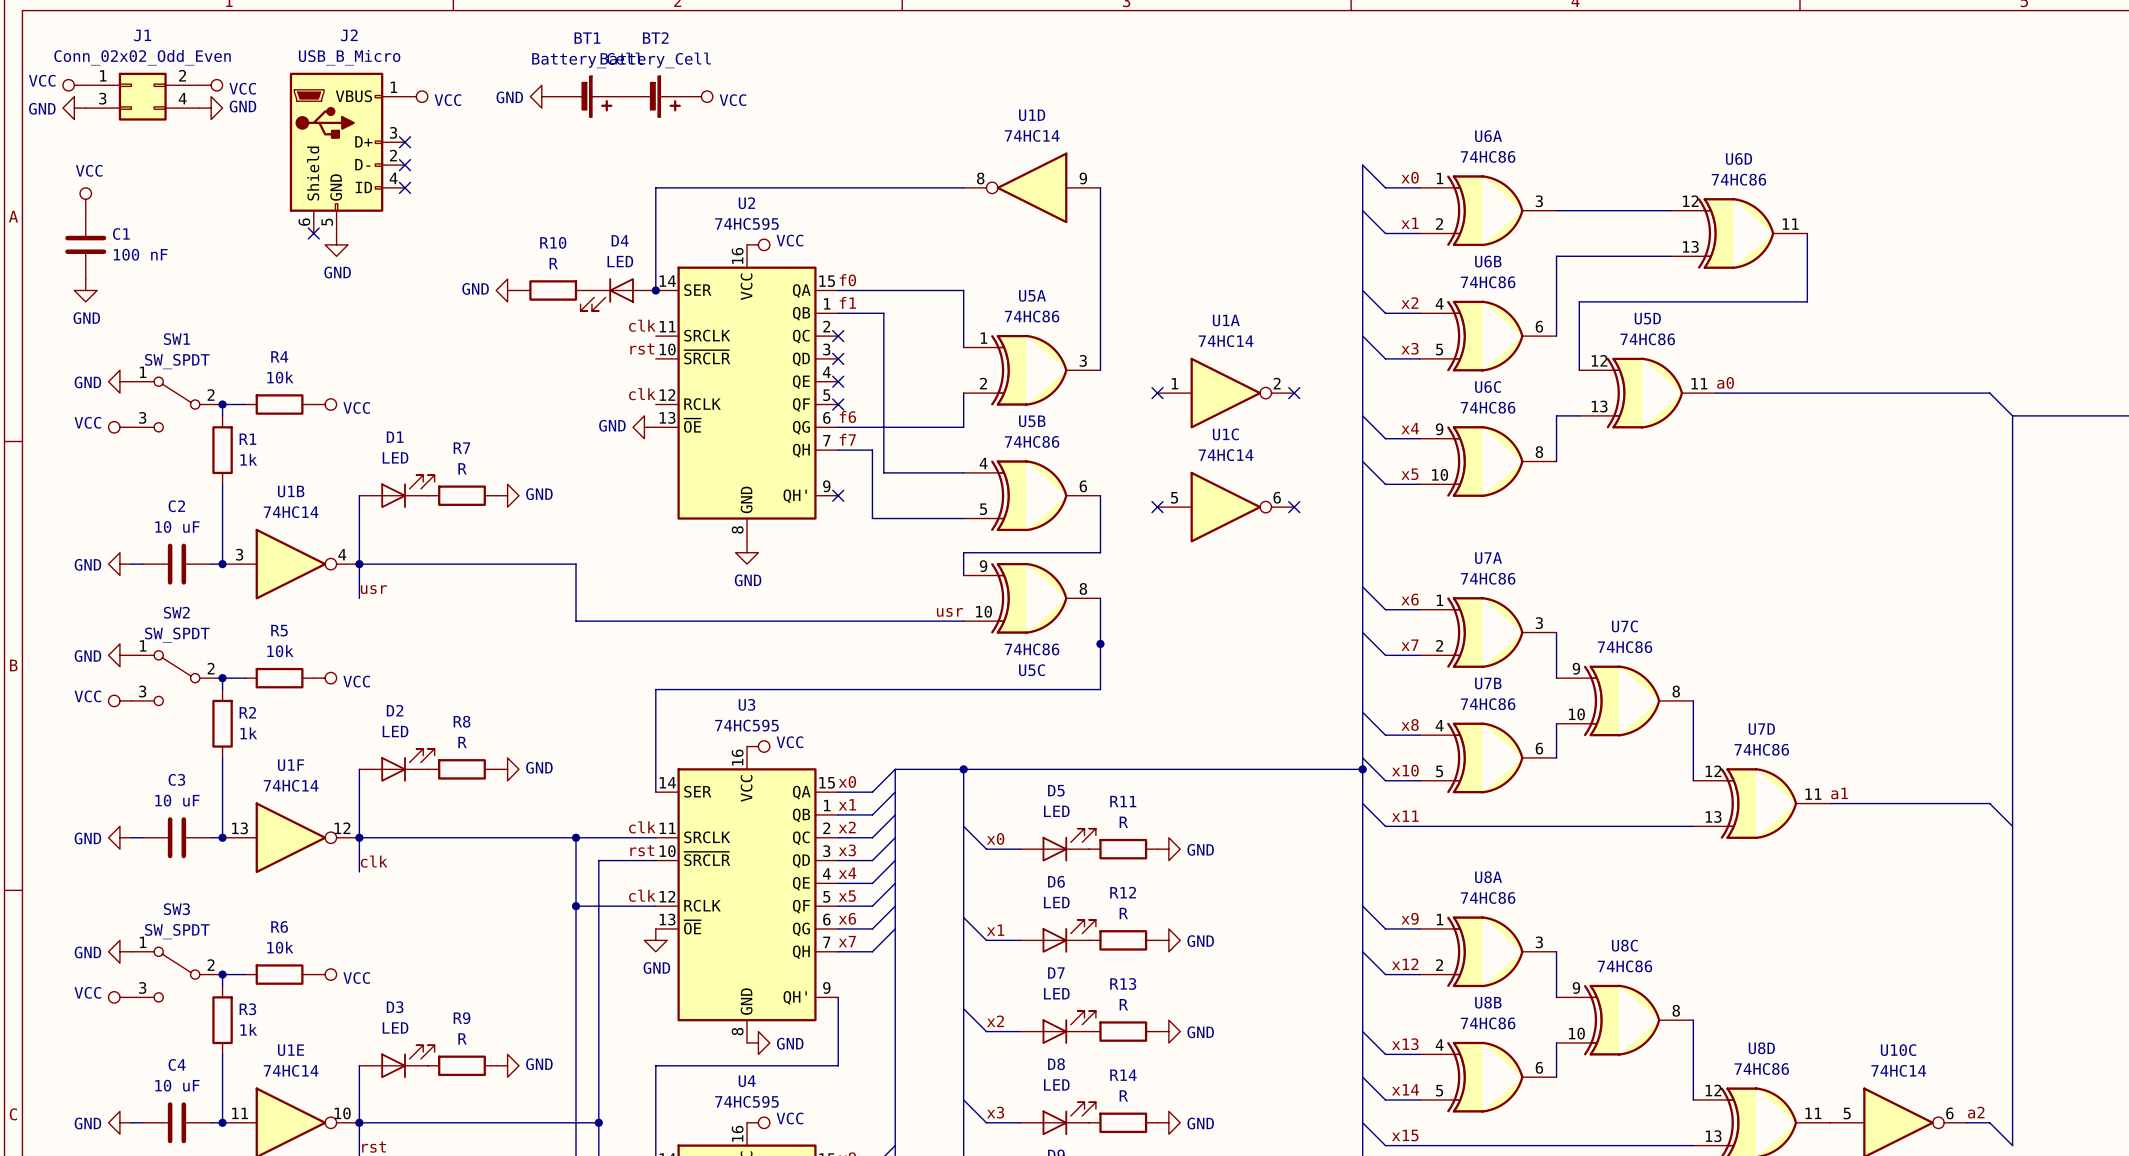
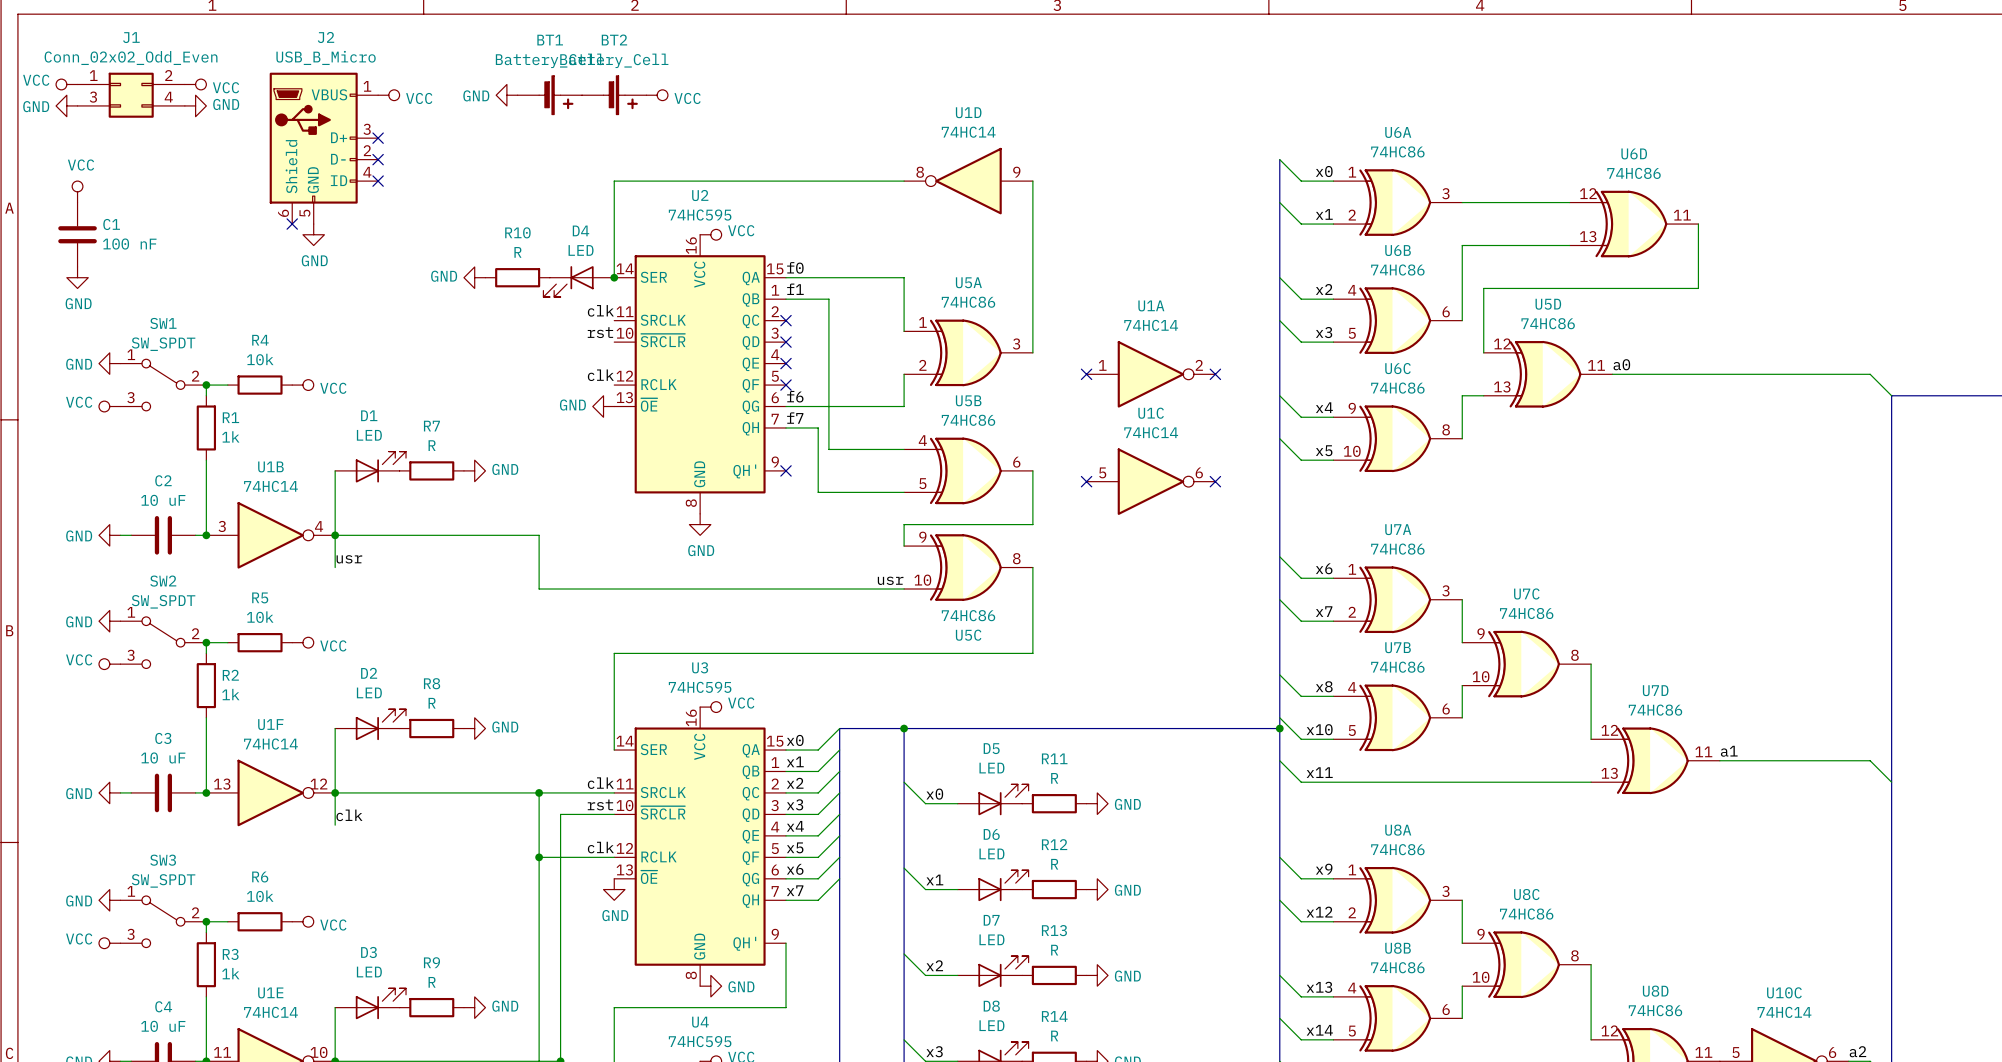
junction: (1100, 643) -> none

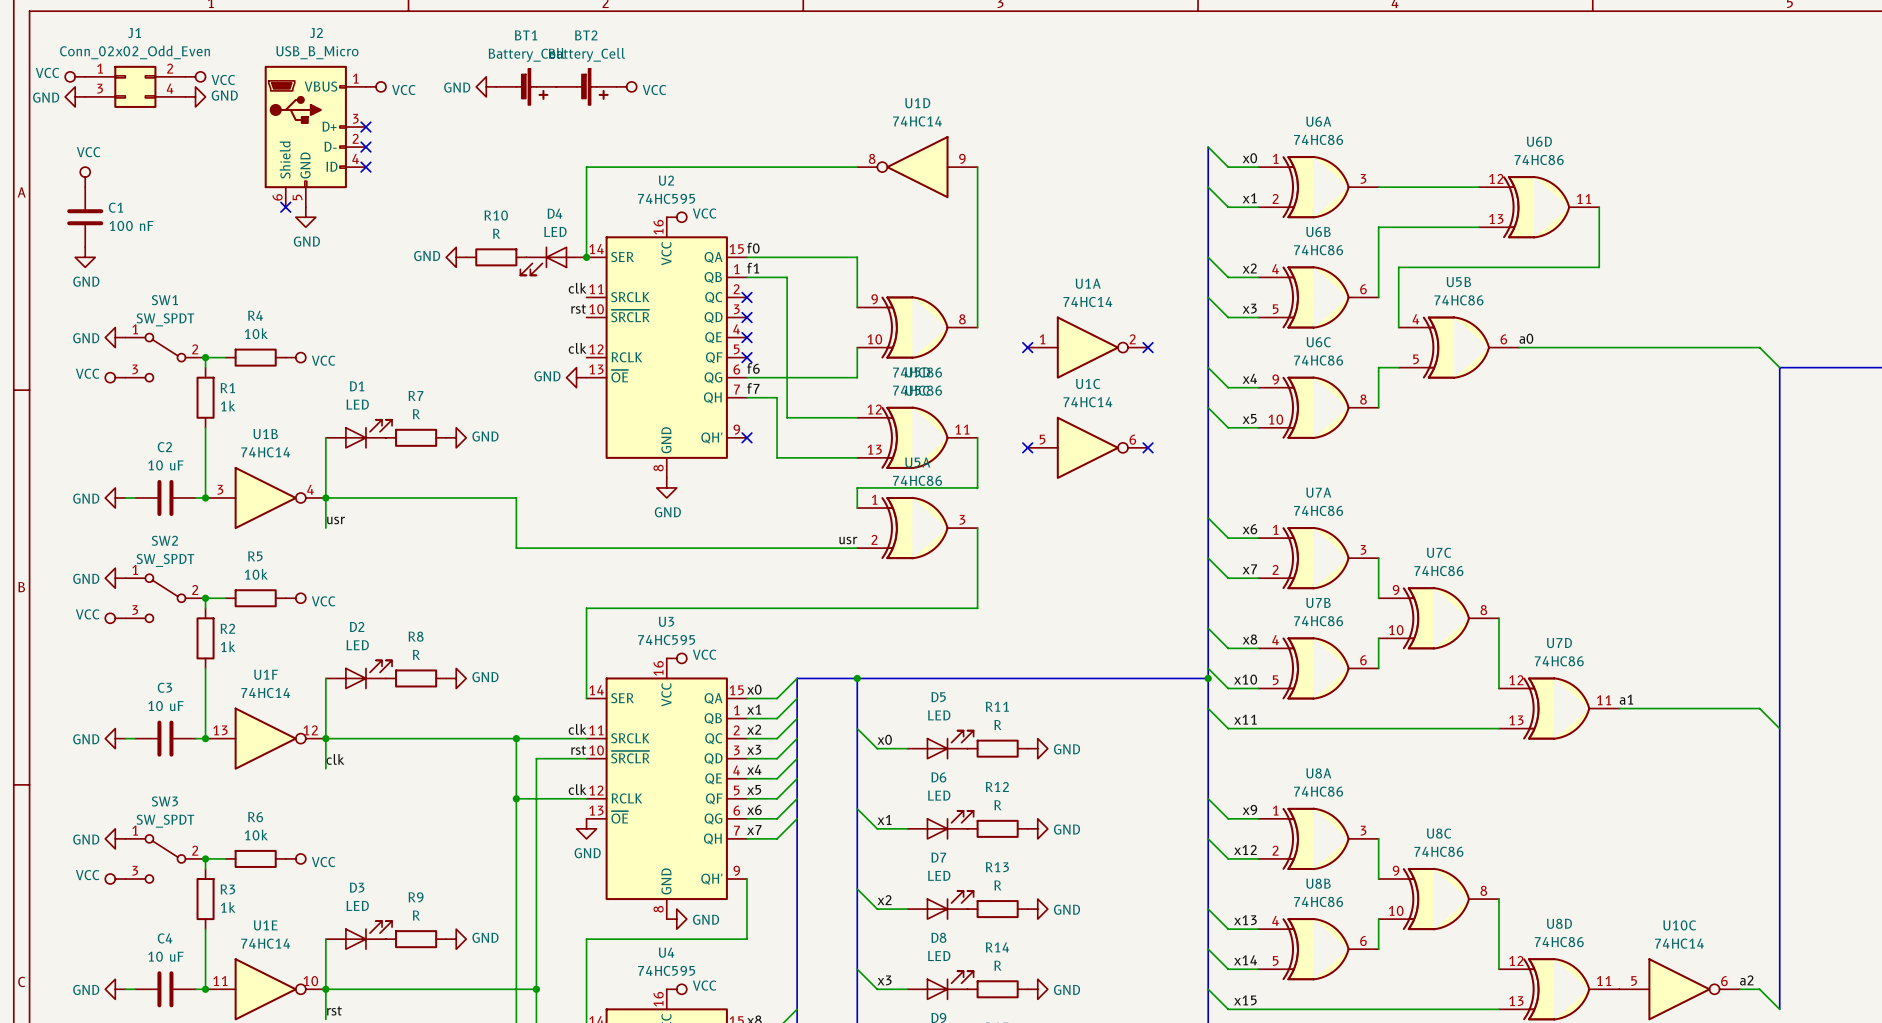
U5A position: (968, 352) -> (917, 528)
U5D position: (1548, 374) -> (917, 437)
U5B position: (968, 470) -> (1458, 347)
U5C position: (968, 567) -> (917, 327)

